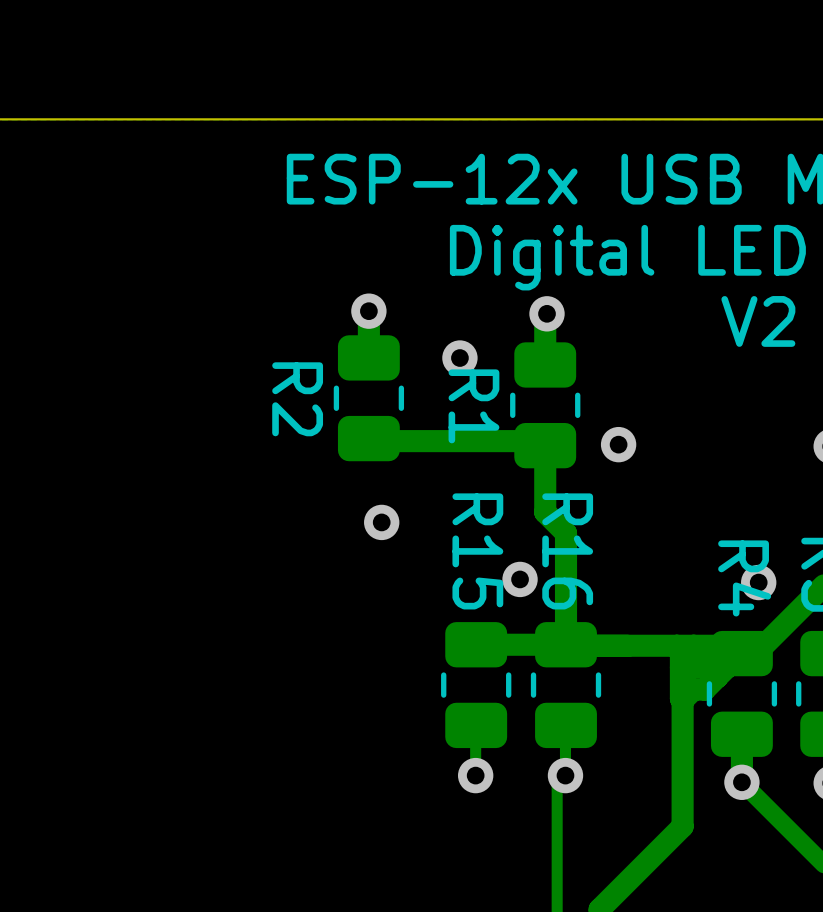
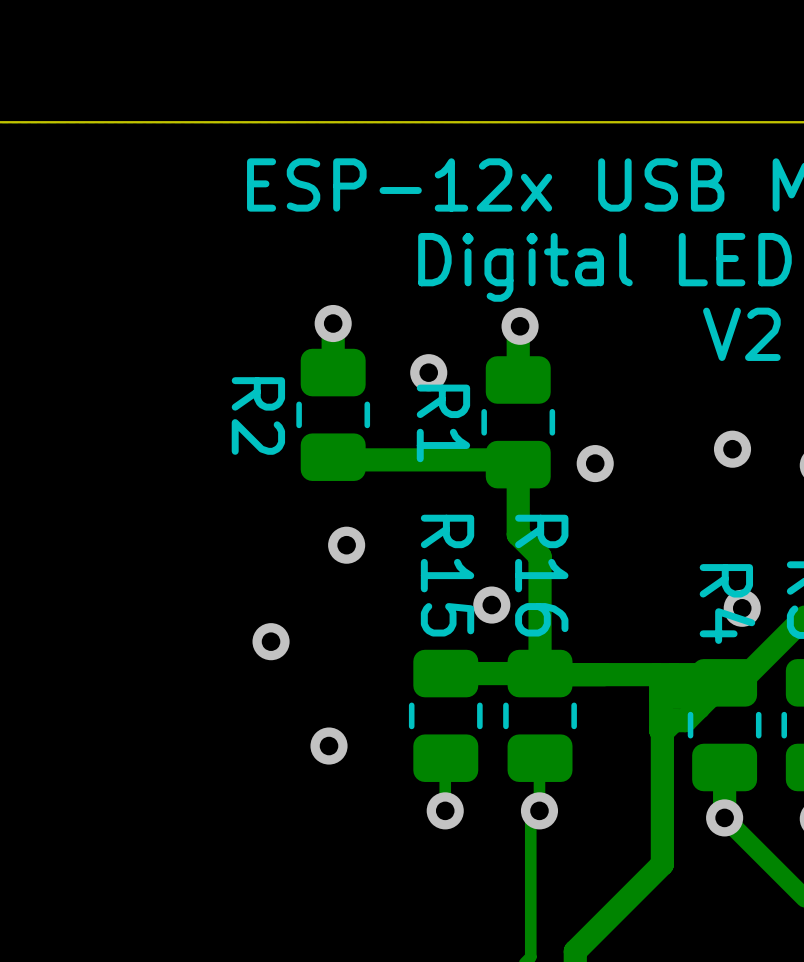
via: none -> (732, 449)
via: none -> (271, 641)
via: none -> (329, 746)

